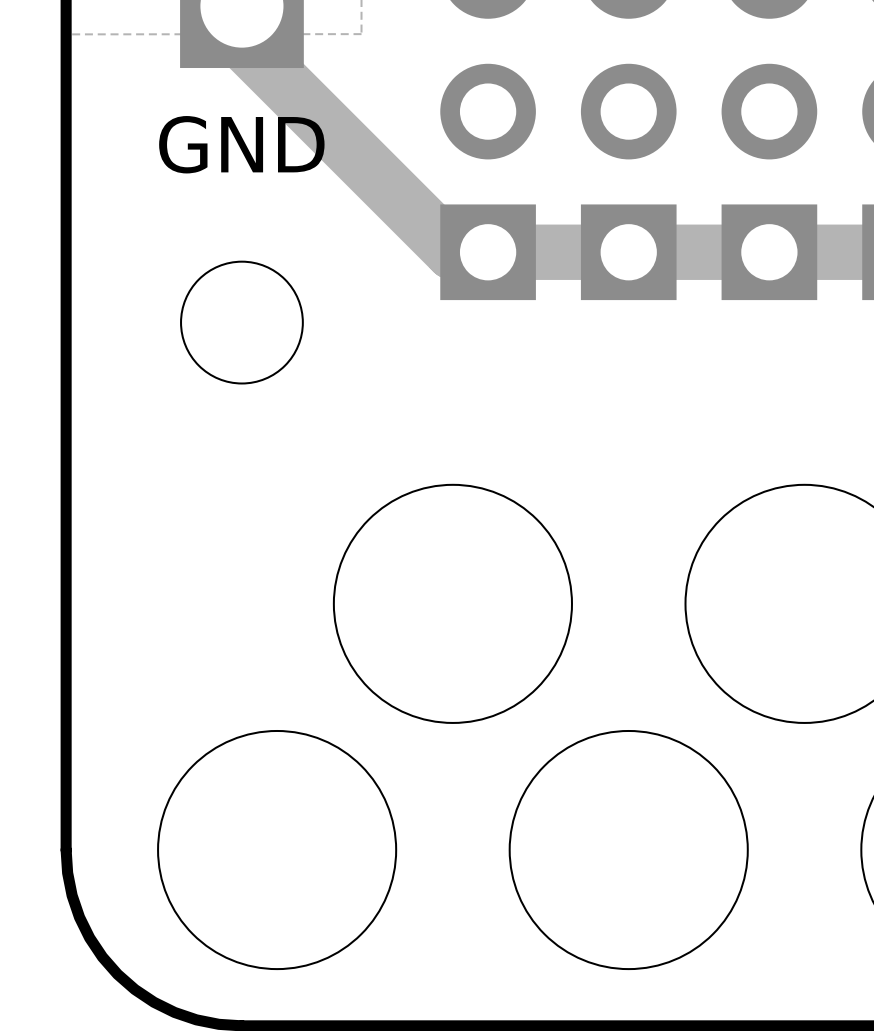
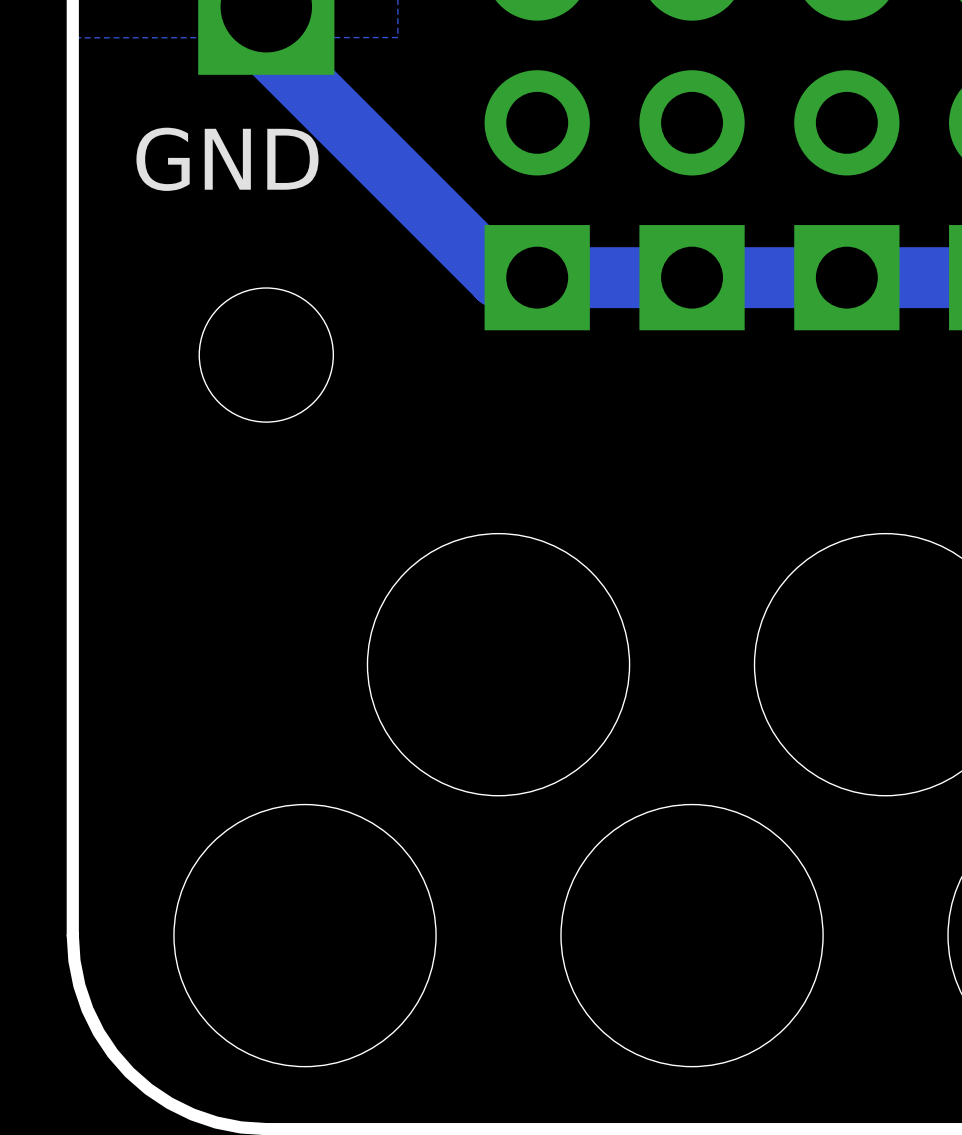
text position: GND (241, 144) -> GND (227, 159)

